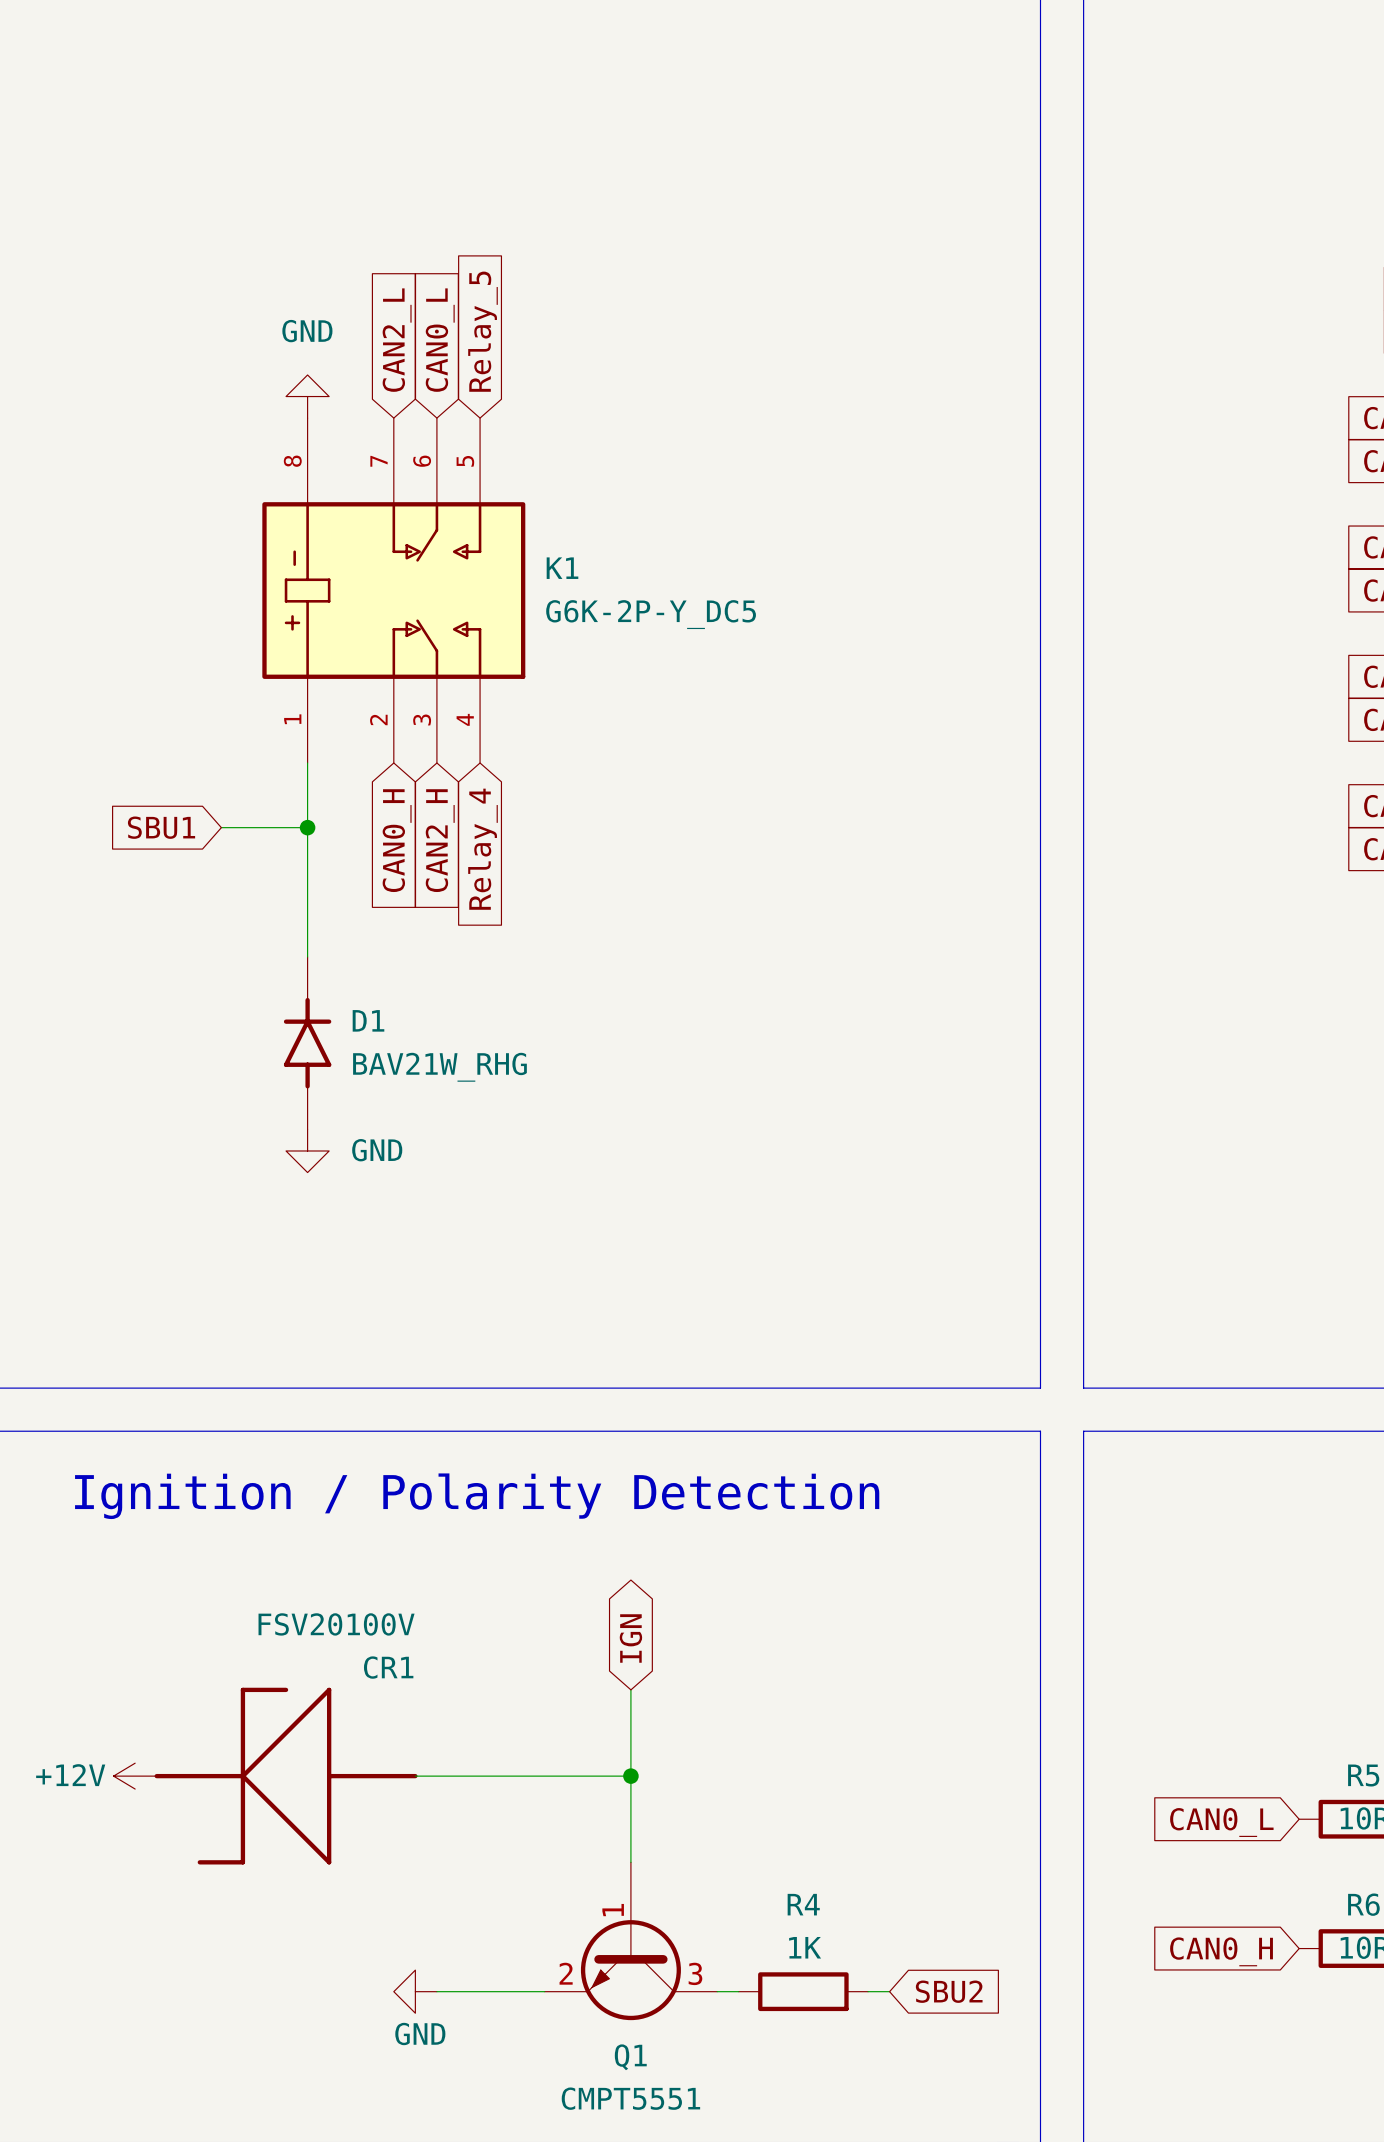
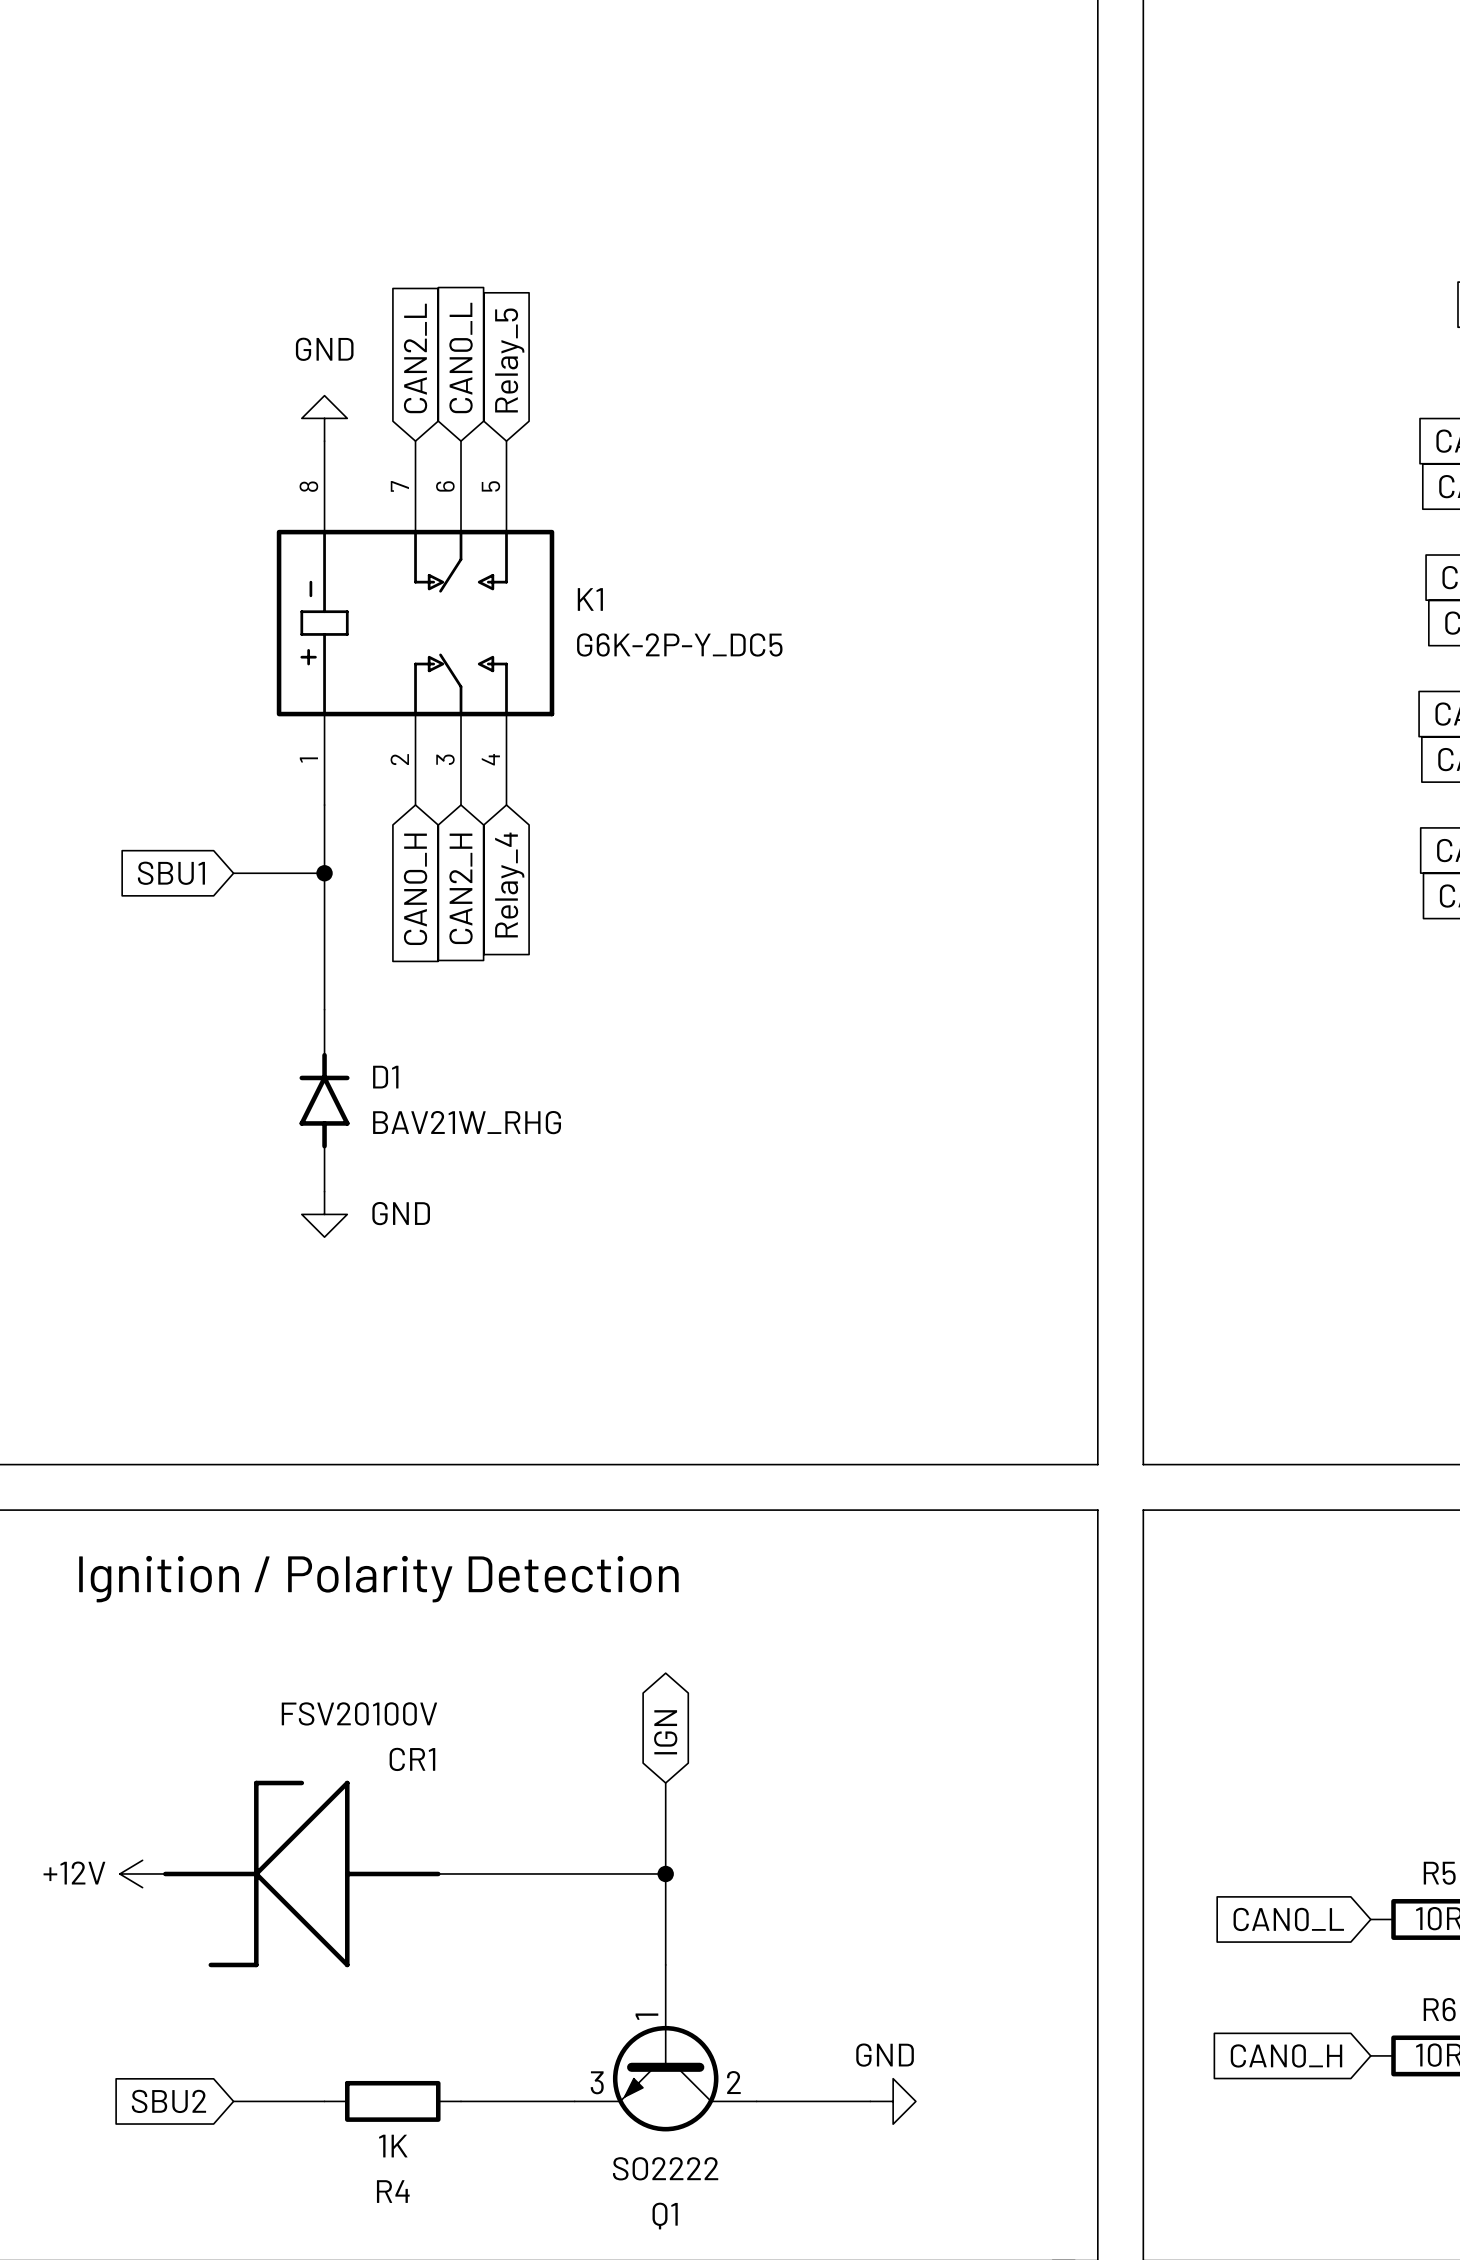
R4 name position: R4 (803, 1904) -> R4 (393, 2191)
R4 value position: 1K (805, 1947) -> 1K (393, 2146)
Q1 pin number: 2 (566, 1973) -> 3 (597, 2082)
Q1 pin number: 3 (695, 1973) -> 2 (733, 2082)
global label: none -> SBU2 (168, 2101)
wire: none -> (233, 2101) (324, 2101)
power symbol: GND (415, 1991) -> none
wire: none -> (779, 2101) (870, 2101)
R4 position: (803, 1991) -> (392, 2101)
power symbol: none -> GND (893, 2101)
wire: (868, 1991) (889, 1991) -> none
global label: SBU2 (949, 1991) -> none
Q1 name position: Q1 (630, 2057) -> Q1 (665, 2216)
Q1 value: CMPT5551 (630, 2098) -> SO2222 (665, 2168)

